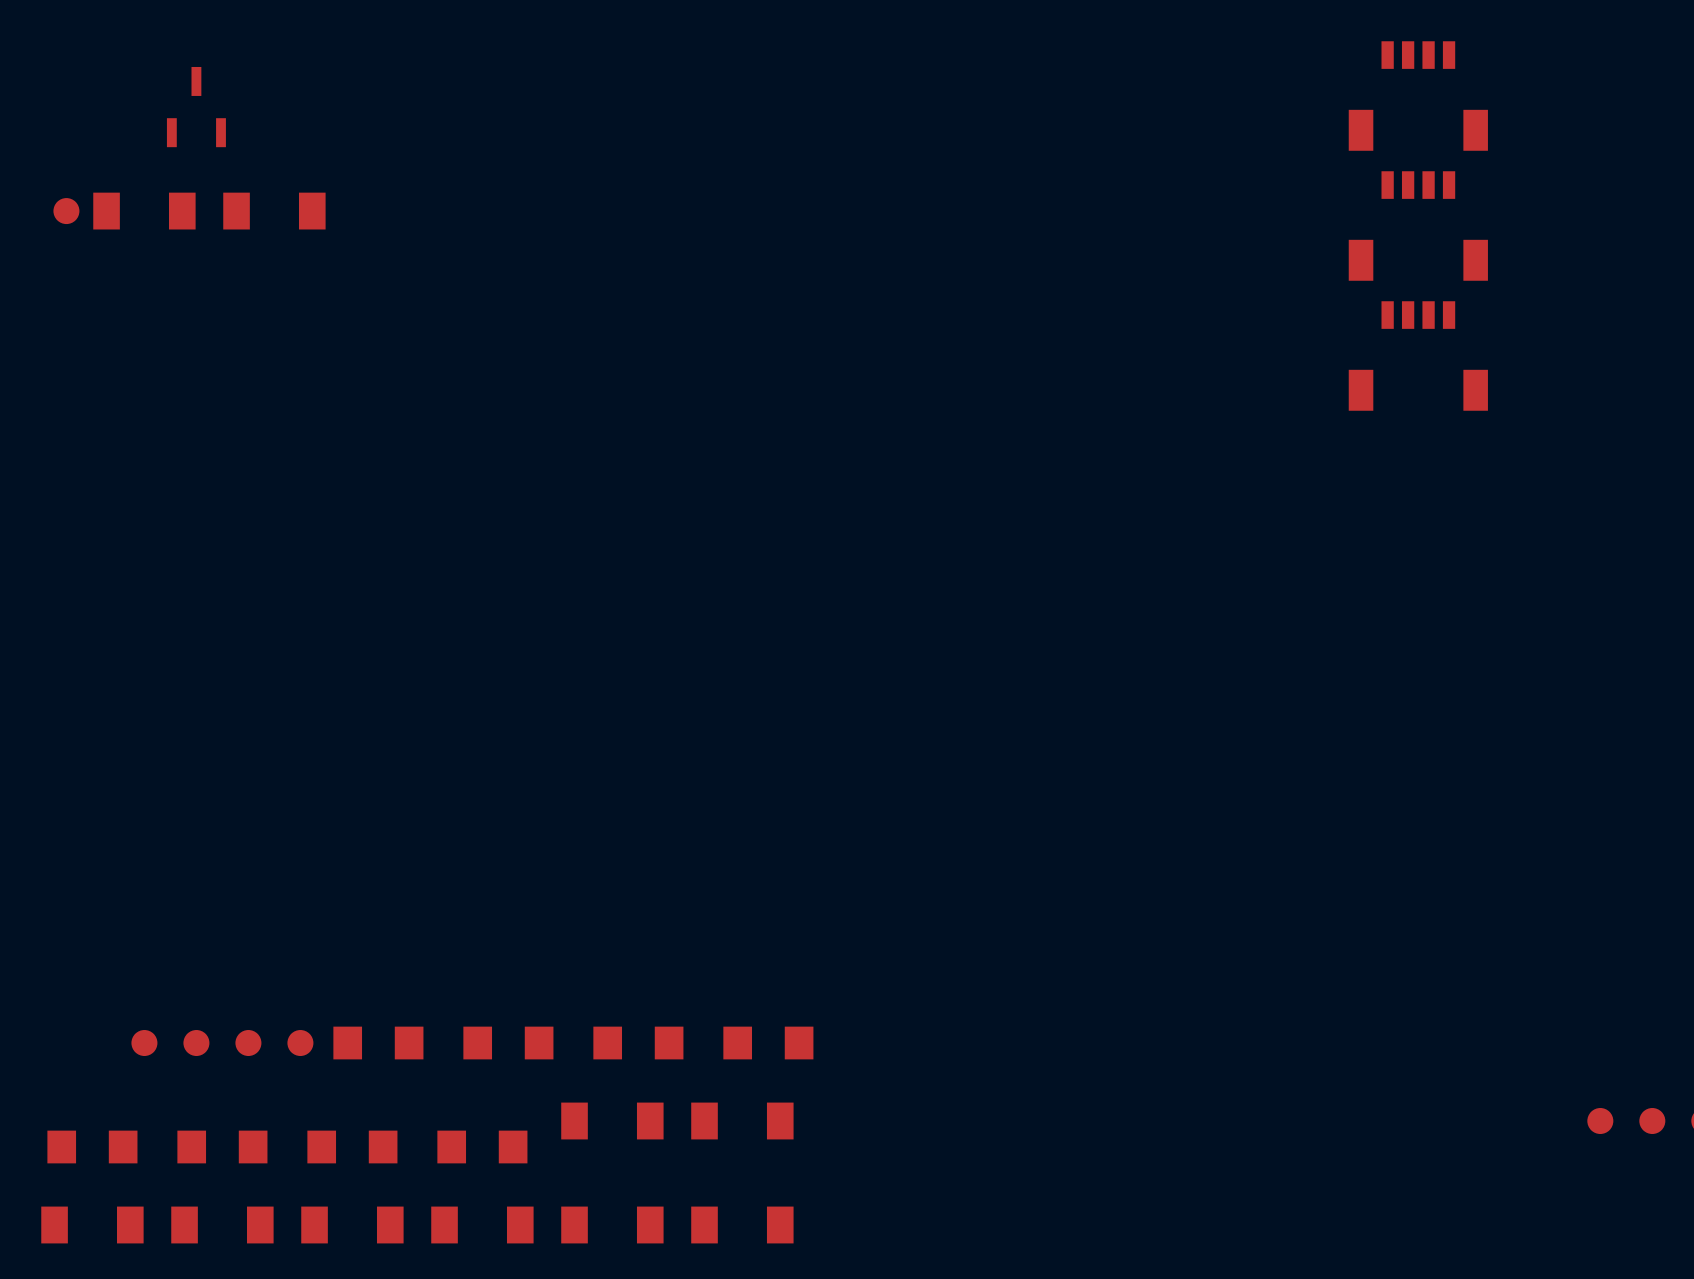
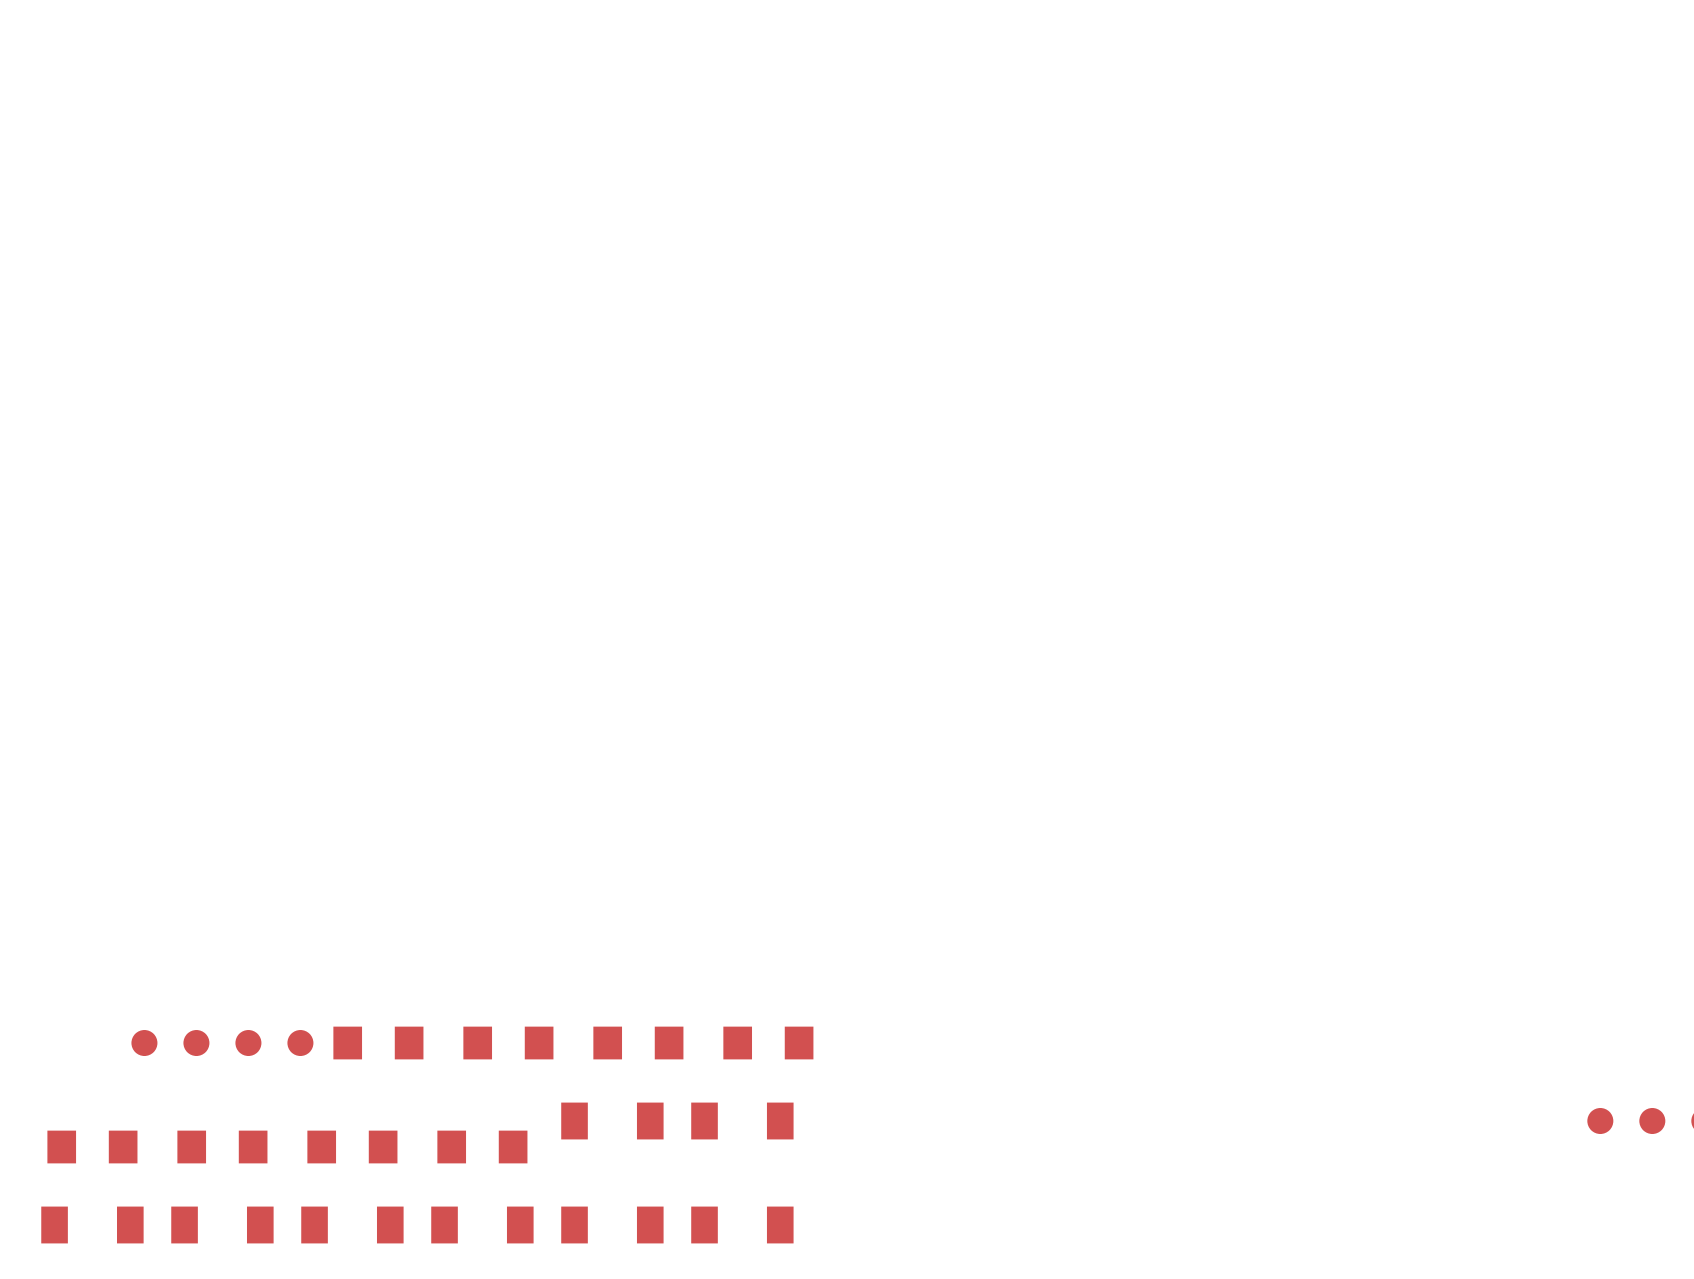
part: (1418, 96) -> none
part: (196, 107) -> none
part: (66, 211) -> none
part: (144, 211) -> none
part: (274, 211) -> none
part: (1418, 226) -> none
part: (1418, 356) -> none

